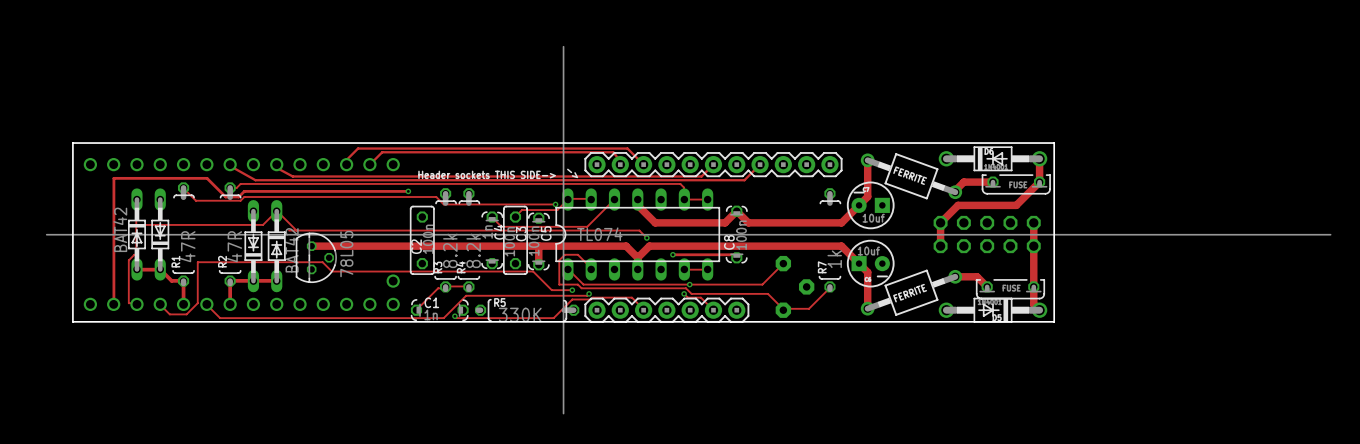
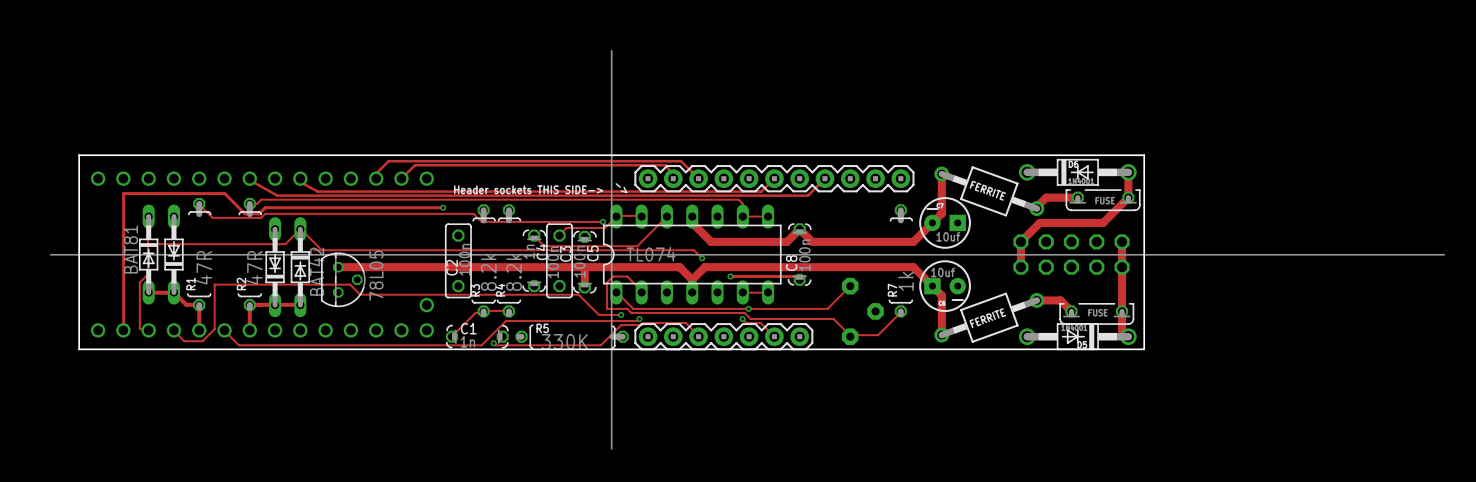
part value: BAT42 (120, 229) -> BAT81 (130, 249)

